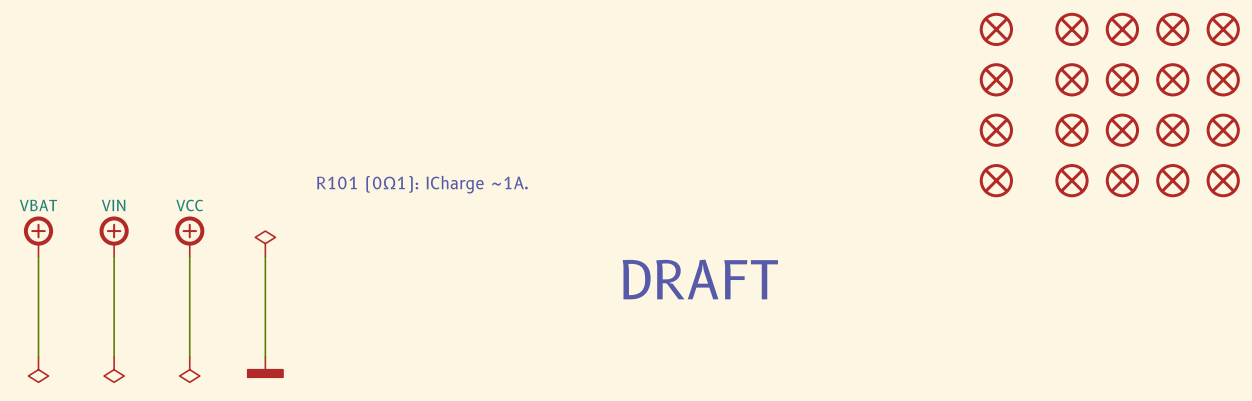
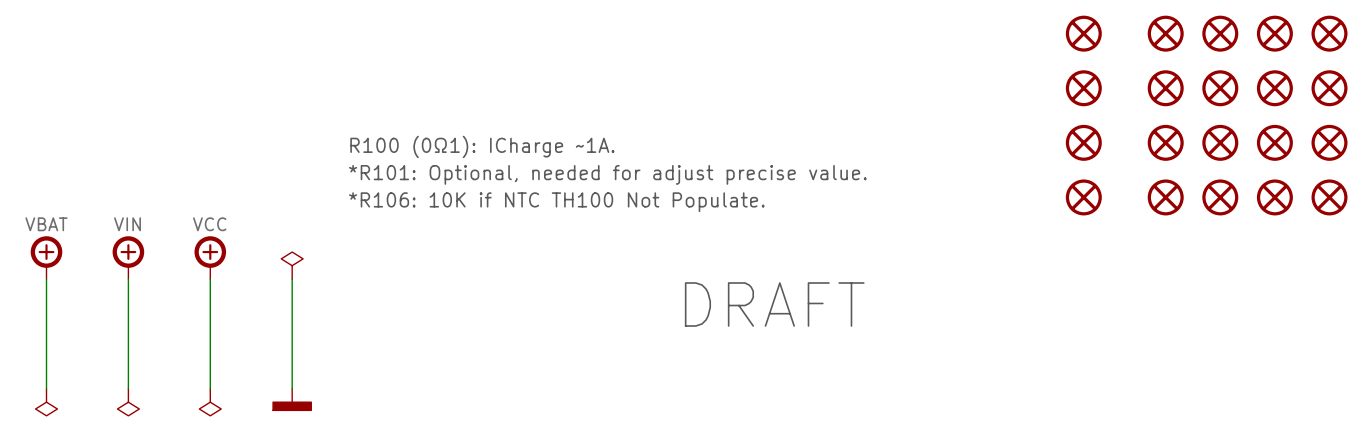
text: none -> R100 (0Ω1): ICharge ~1A. (482, 146)
text: none -> *R101: Optional, needed for adjust precise value. (607, 174)
text: R101 (0Ω1): ICharge ~1A. (422, 184) -> *R106: 10K if NTC TH100 Not Populate. (556, 202)

